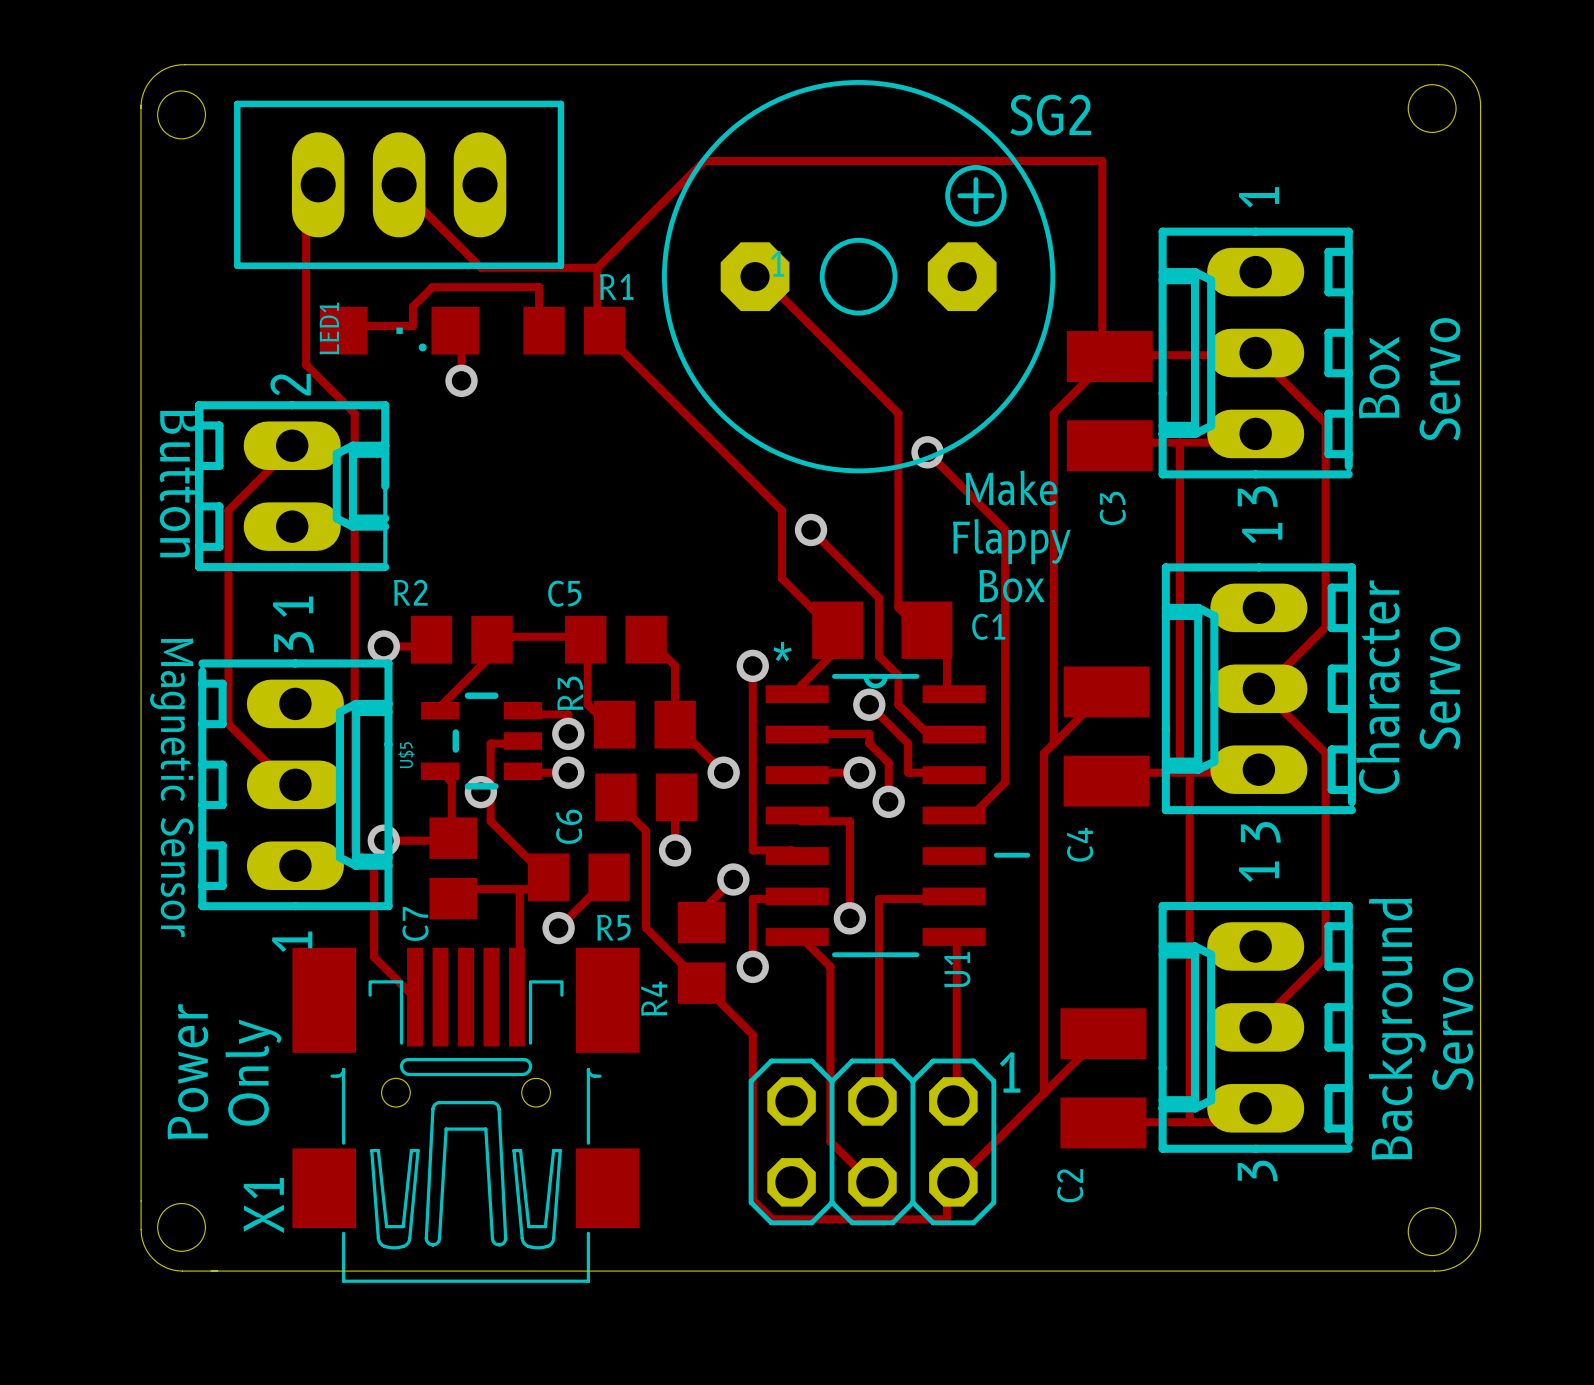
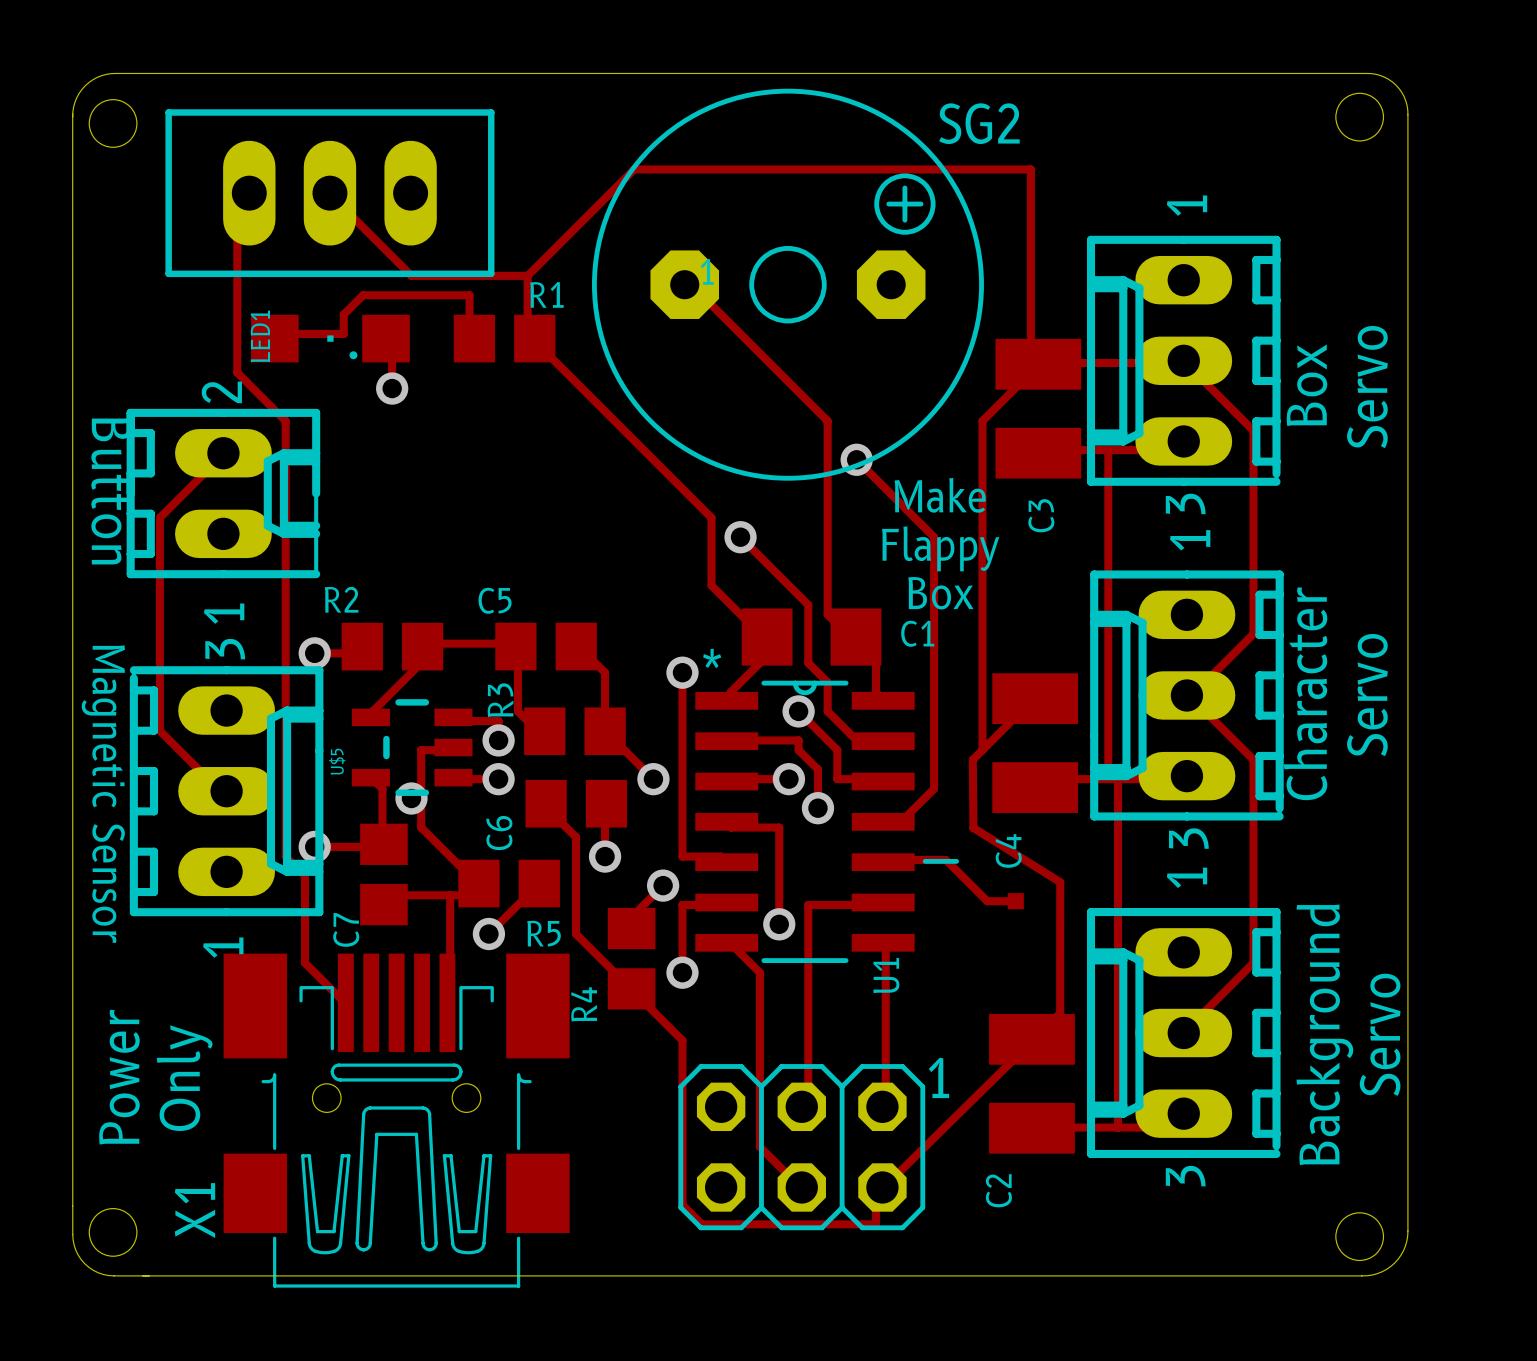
track: (1044, 753) (1044, 1093) -> (972, 759) (973, 827) (1060, 882) (1060, 1013)
track: none -> (883, 862) (885, 859) (945, 859) (987, 901) (1015, 901)
part: none -> (1015, 901)
track: (1102, 1034) (956, 1180) -> (1060, 1013) (885, 1185)

